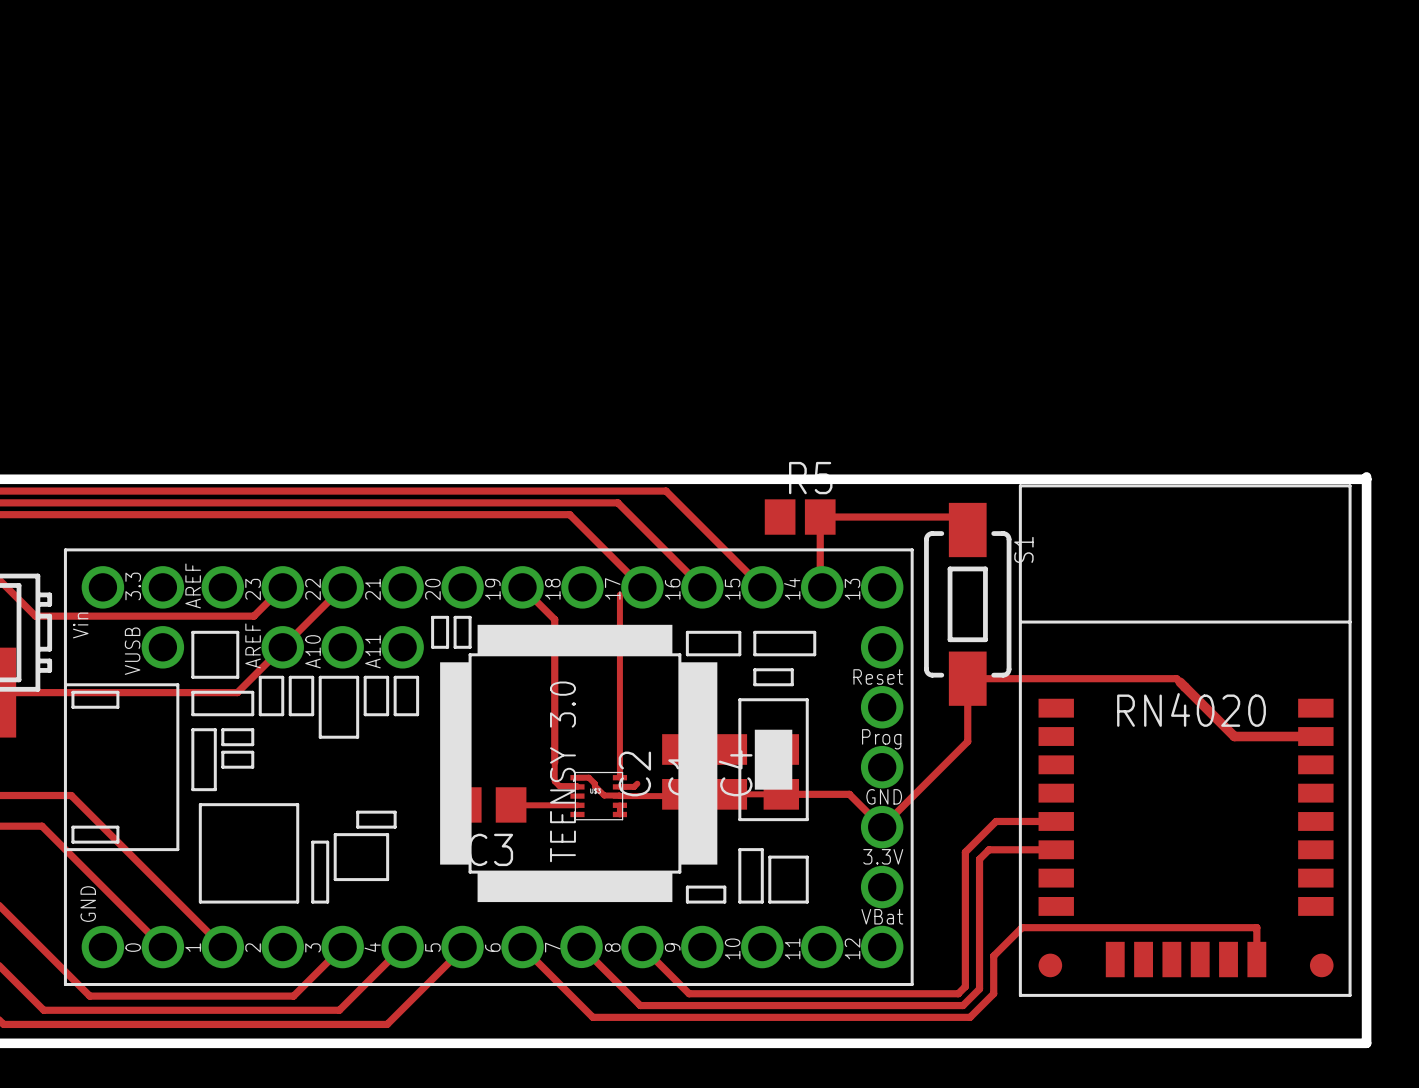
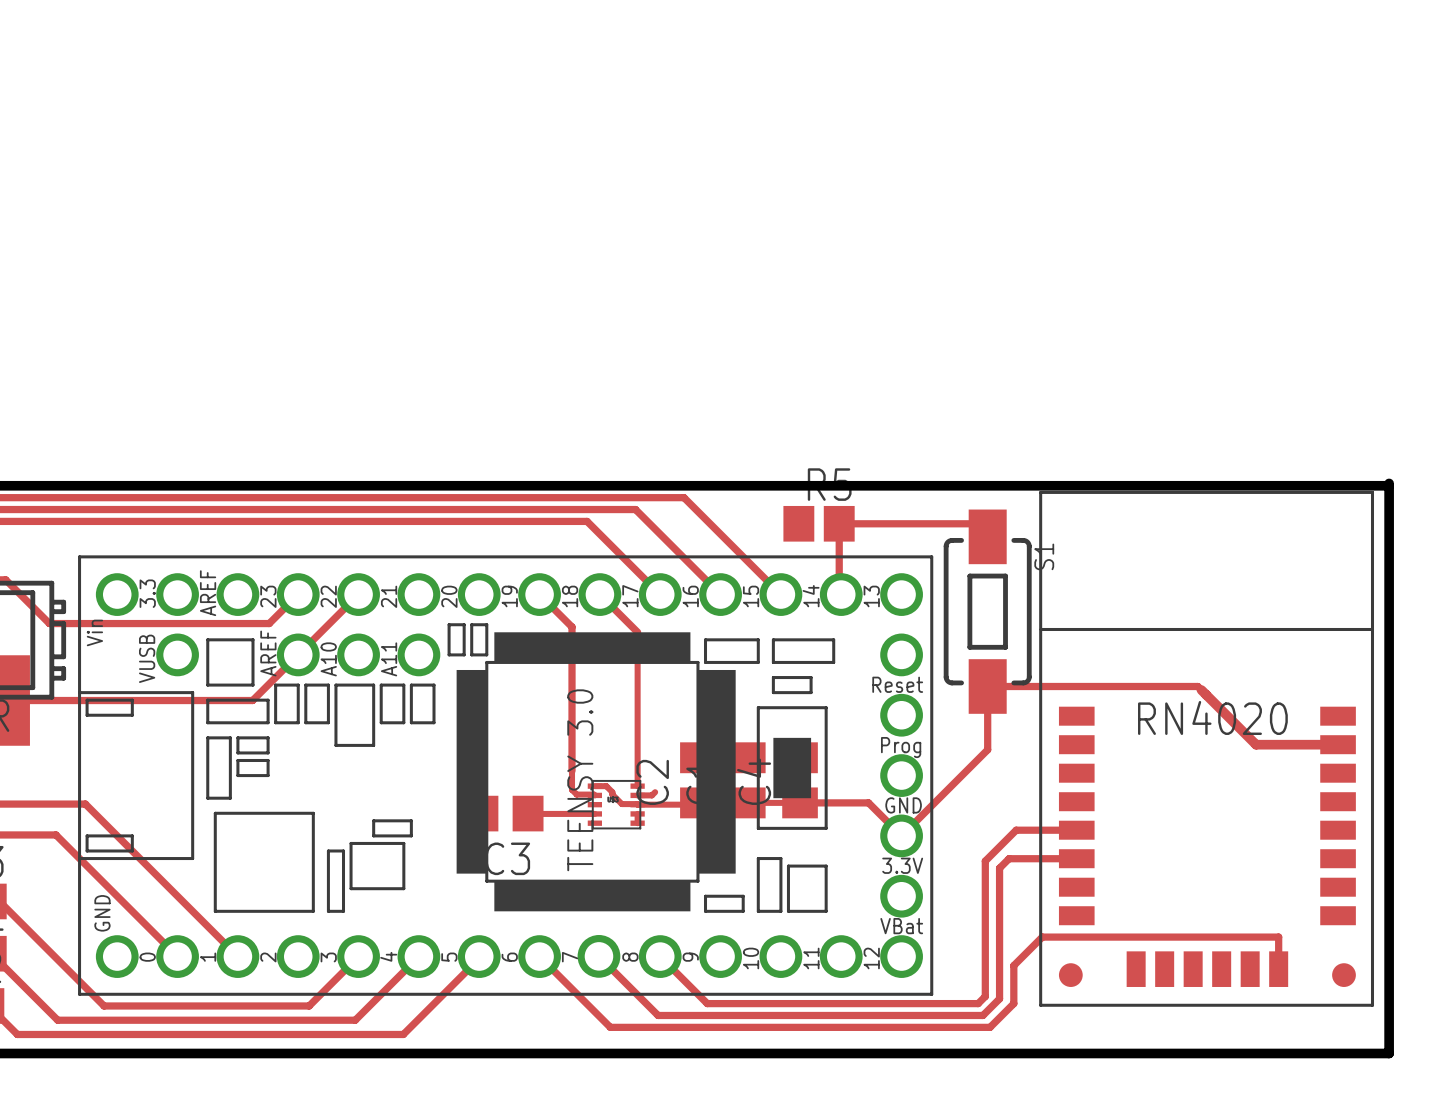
top track: (619, 594) (619, 624) -> (599, 594) (637, 632)

